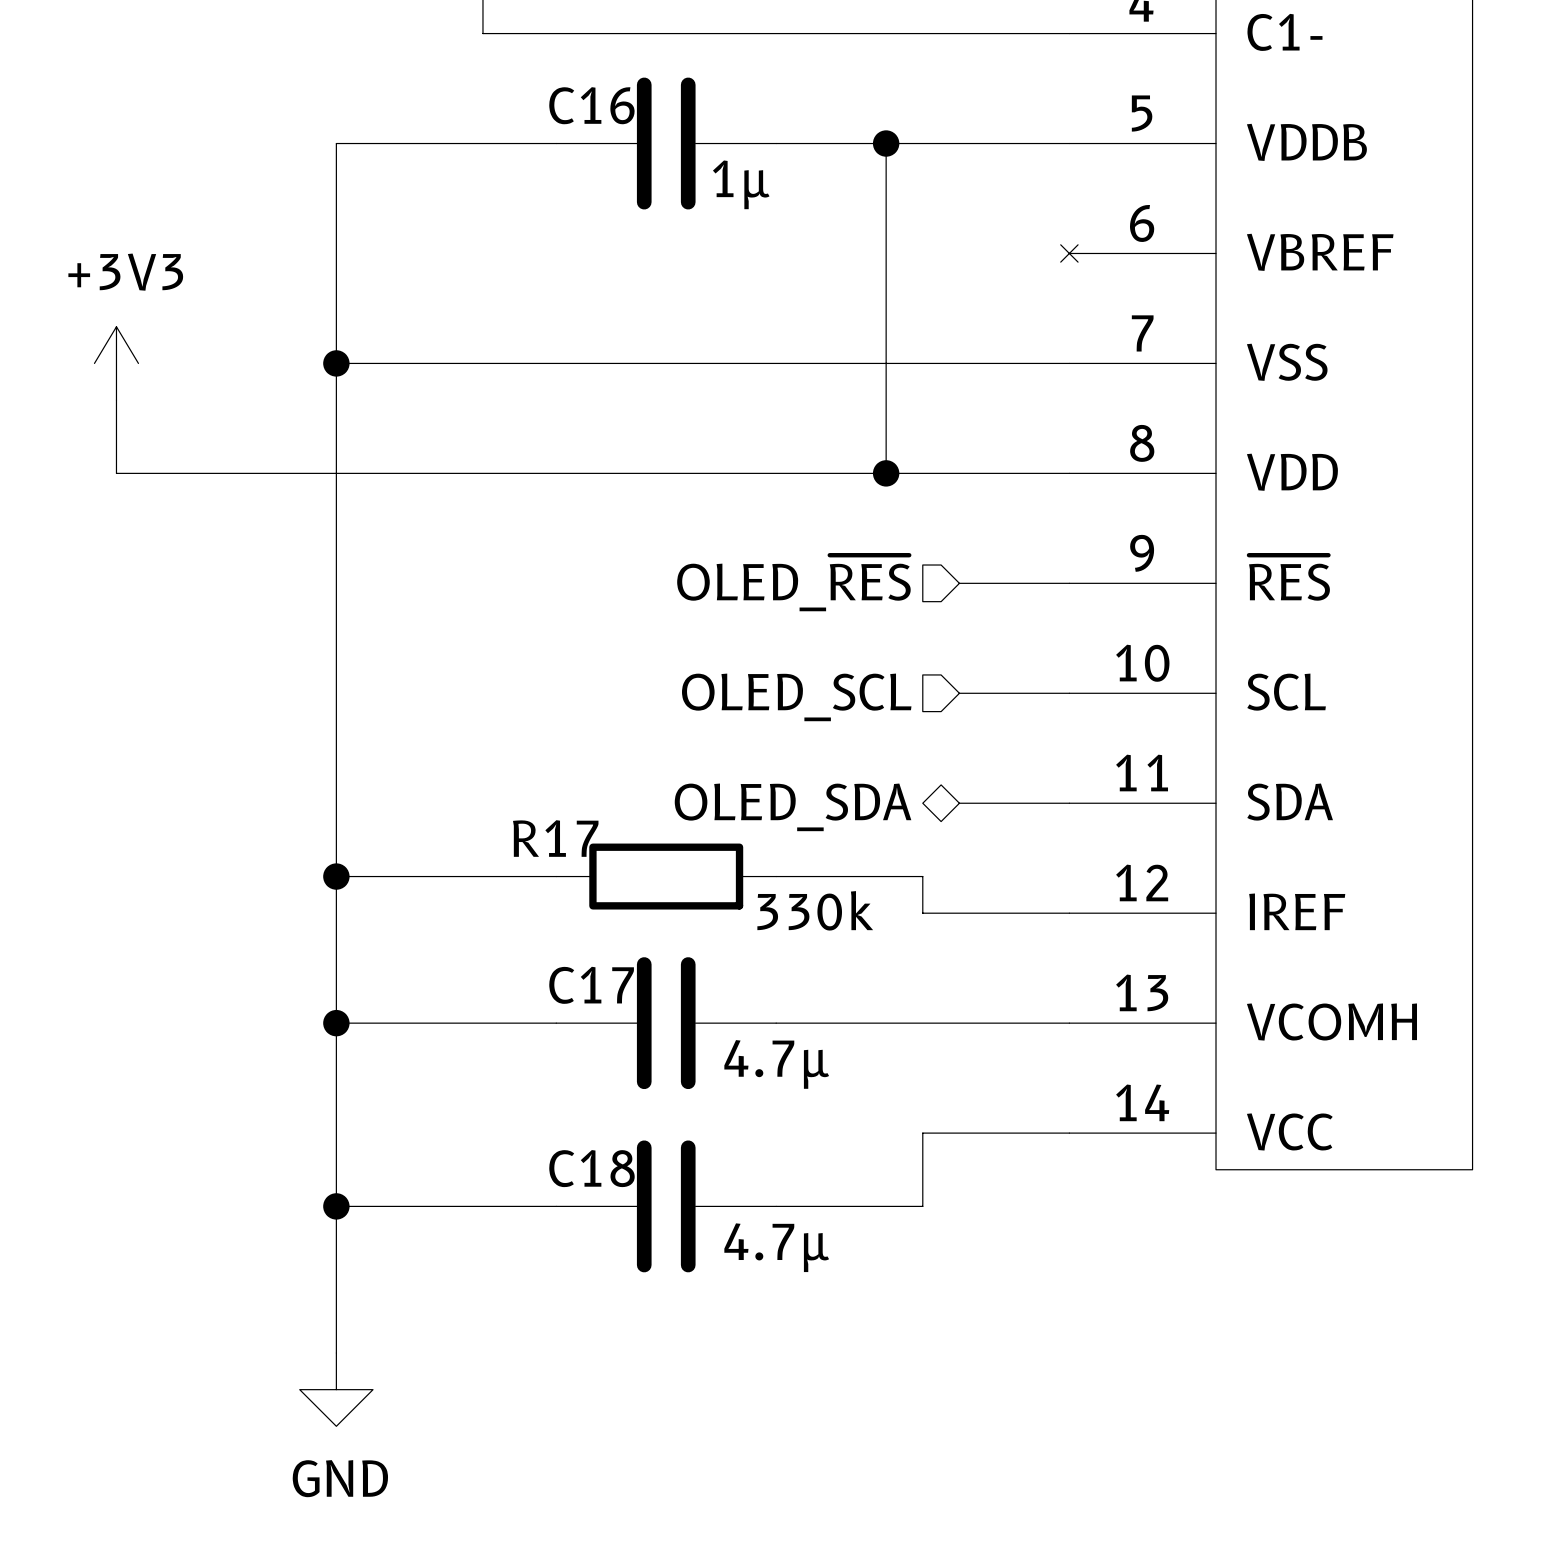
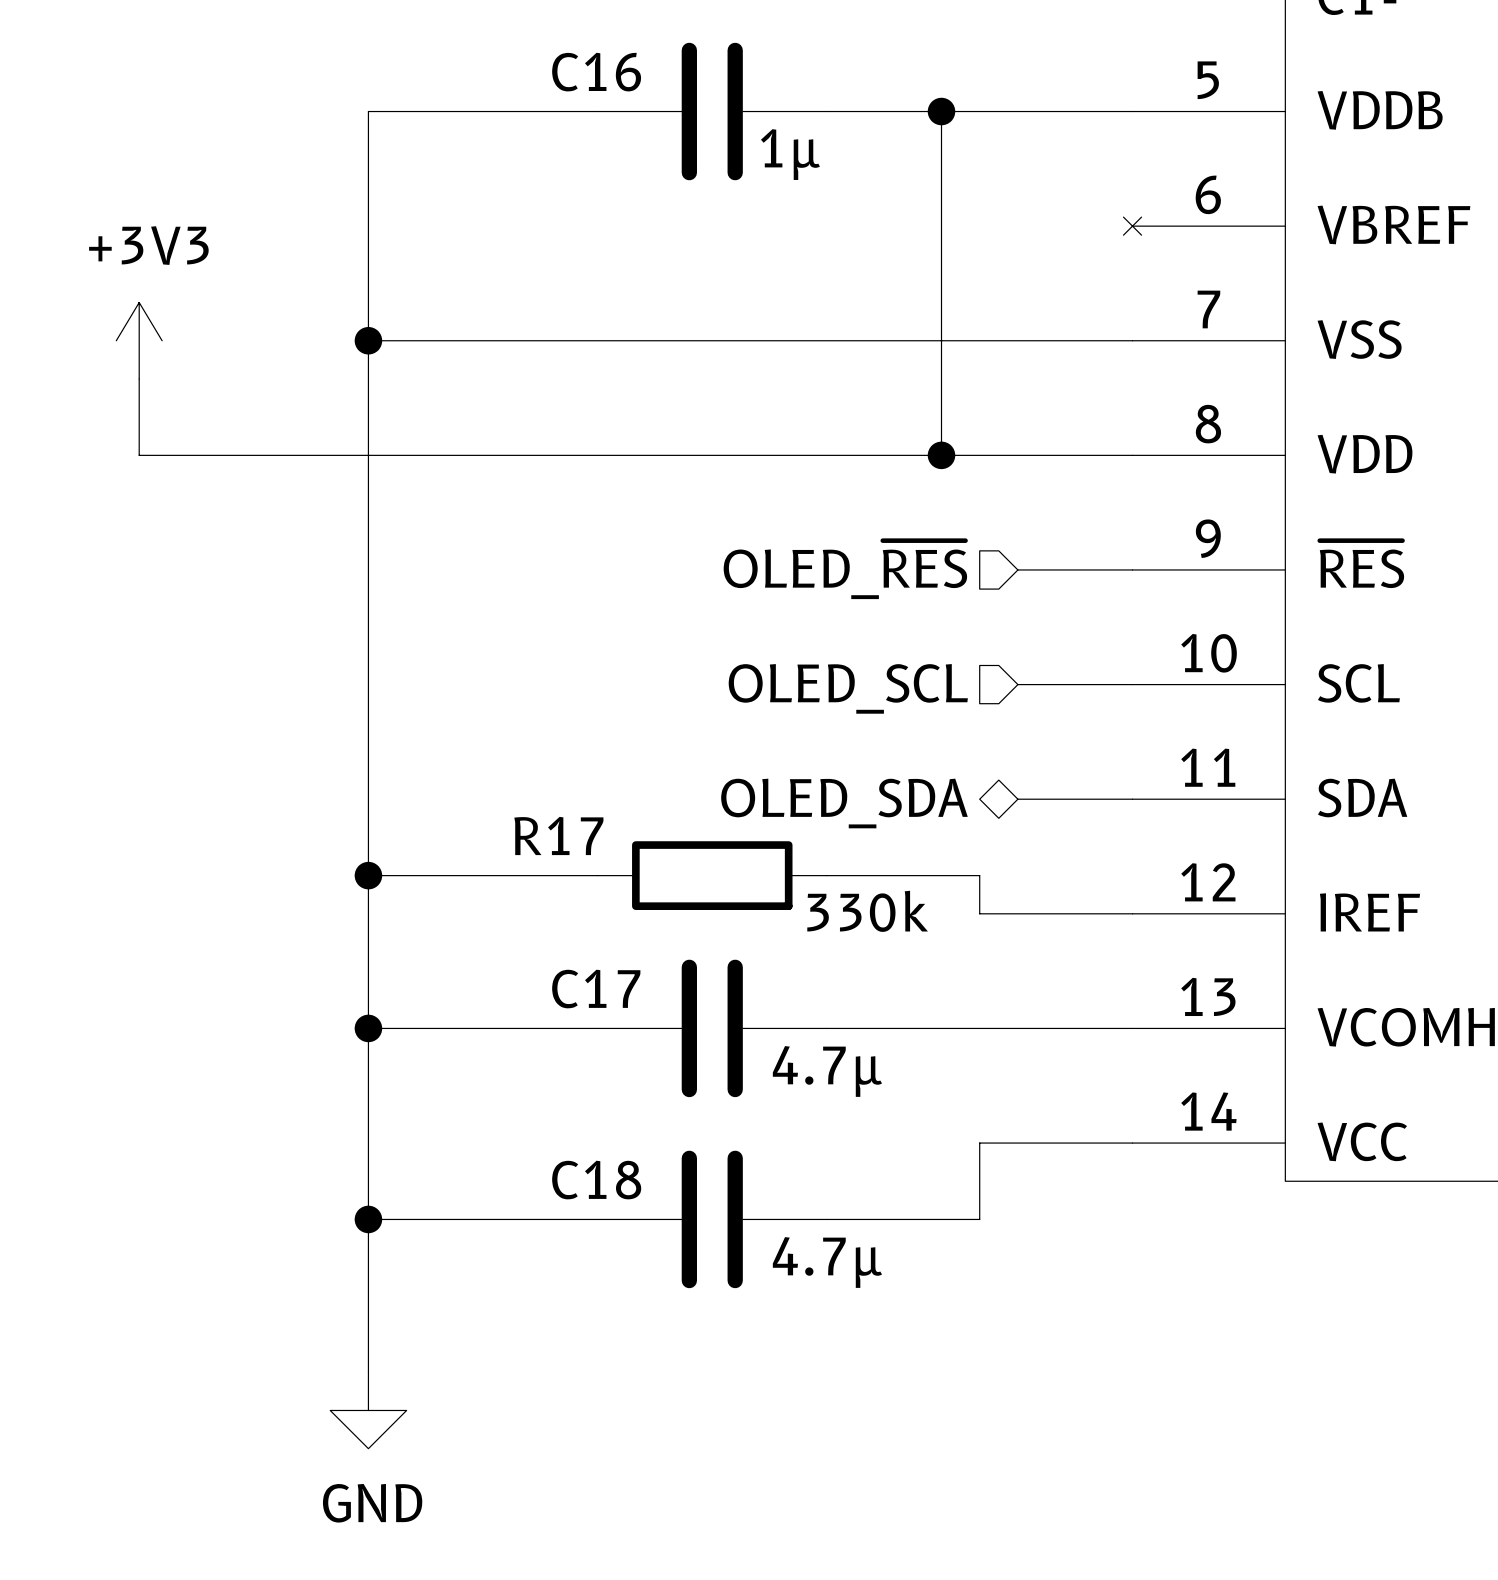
C16 name position: C16 (591, 105) -> C16 (596, 72)
R17 name position: R17 (555, 838) -> R17 (558, 835)
C17 name position: C17 (591, 985) -> C17 (596, 989)
C18 name position: C18 (591, 1168) -> C18 (596, 1180)

